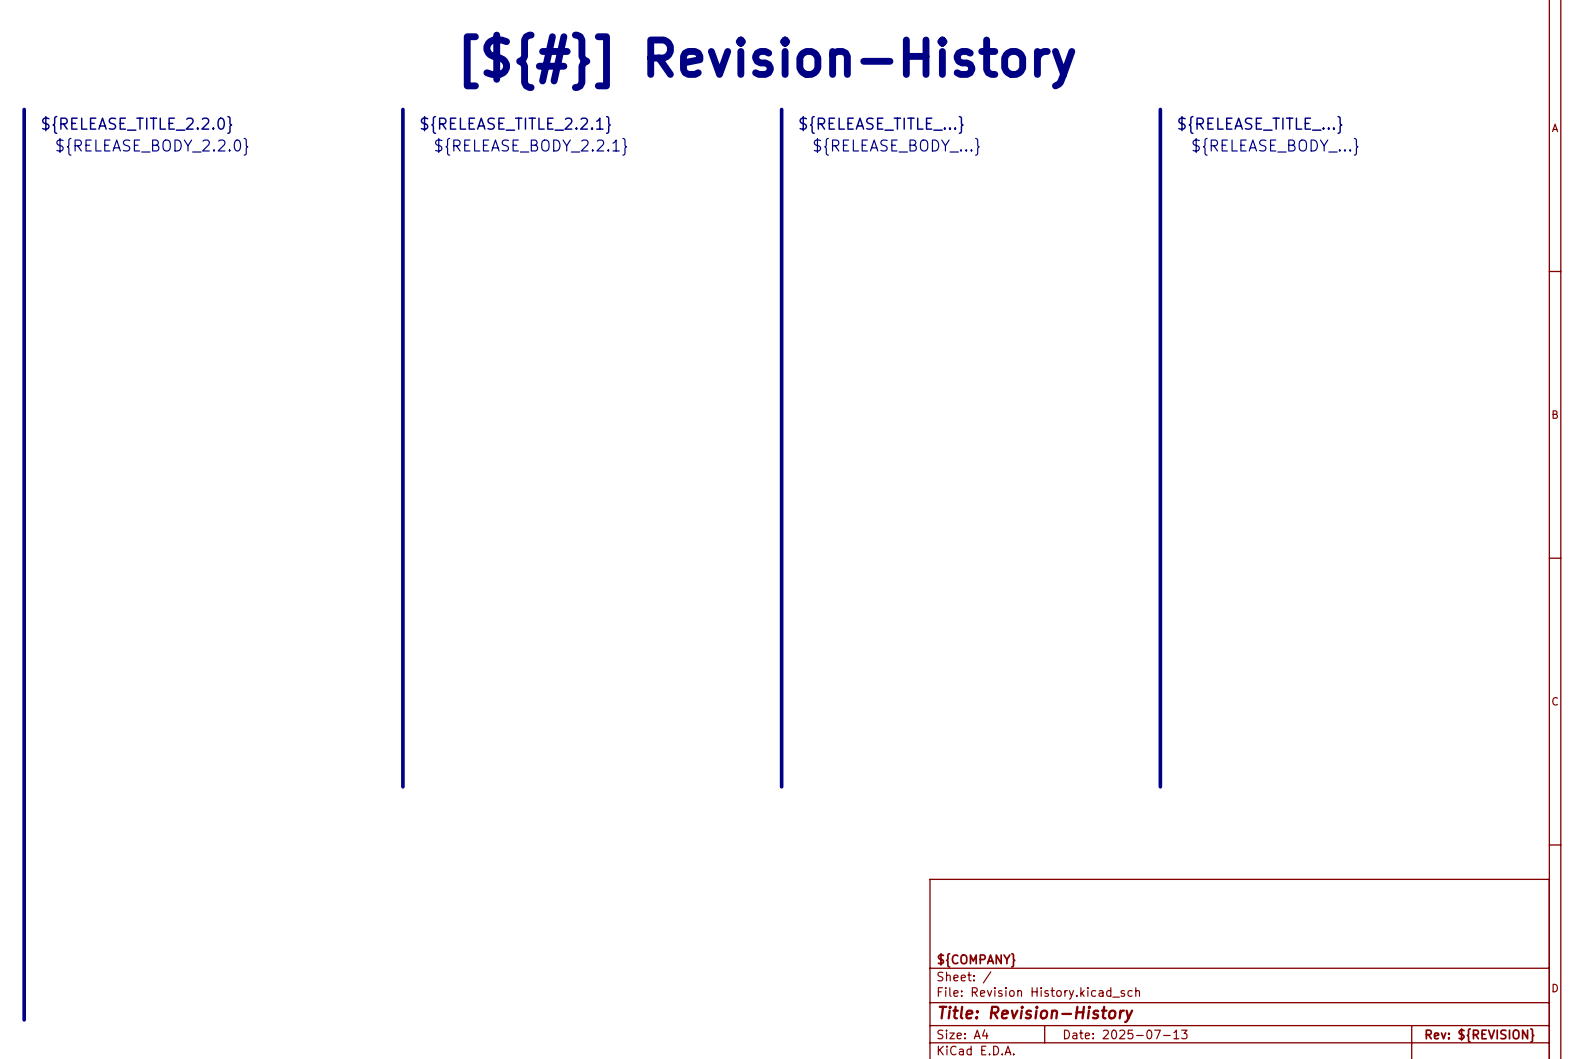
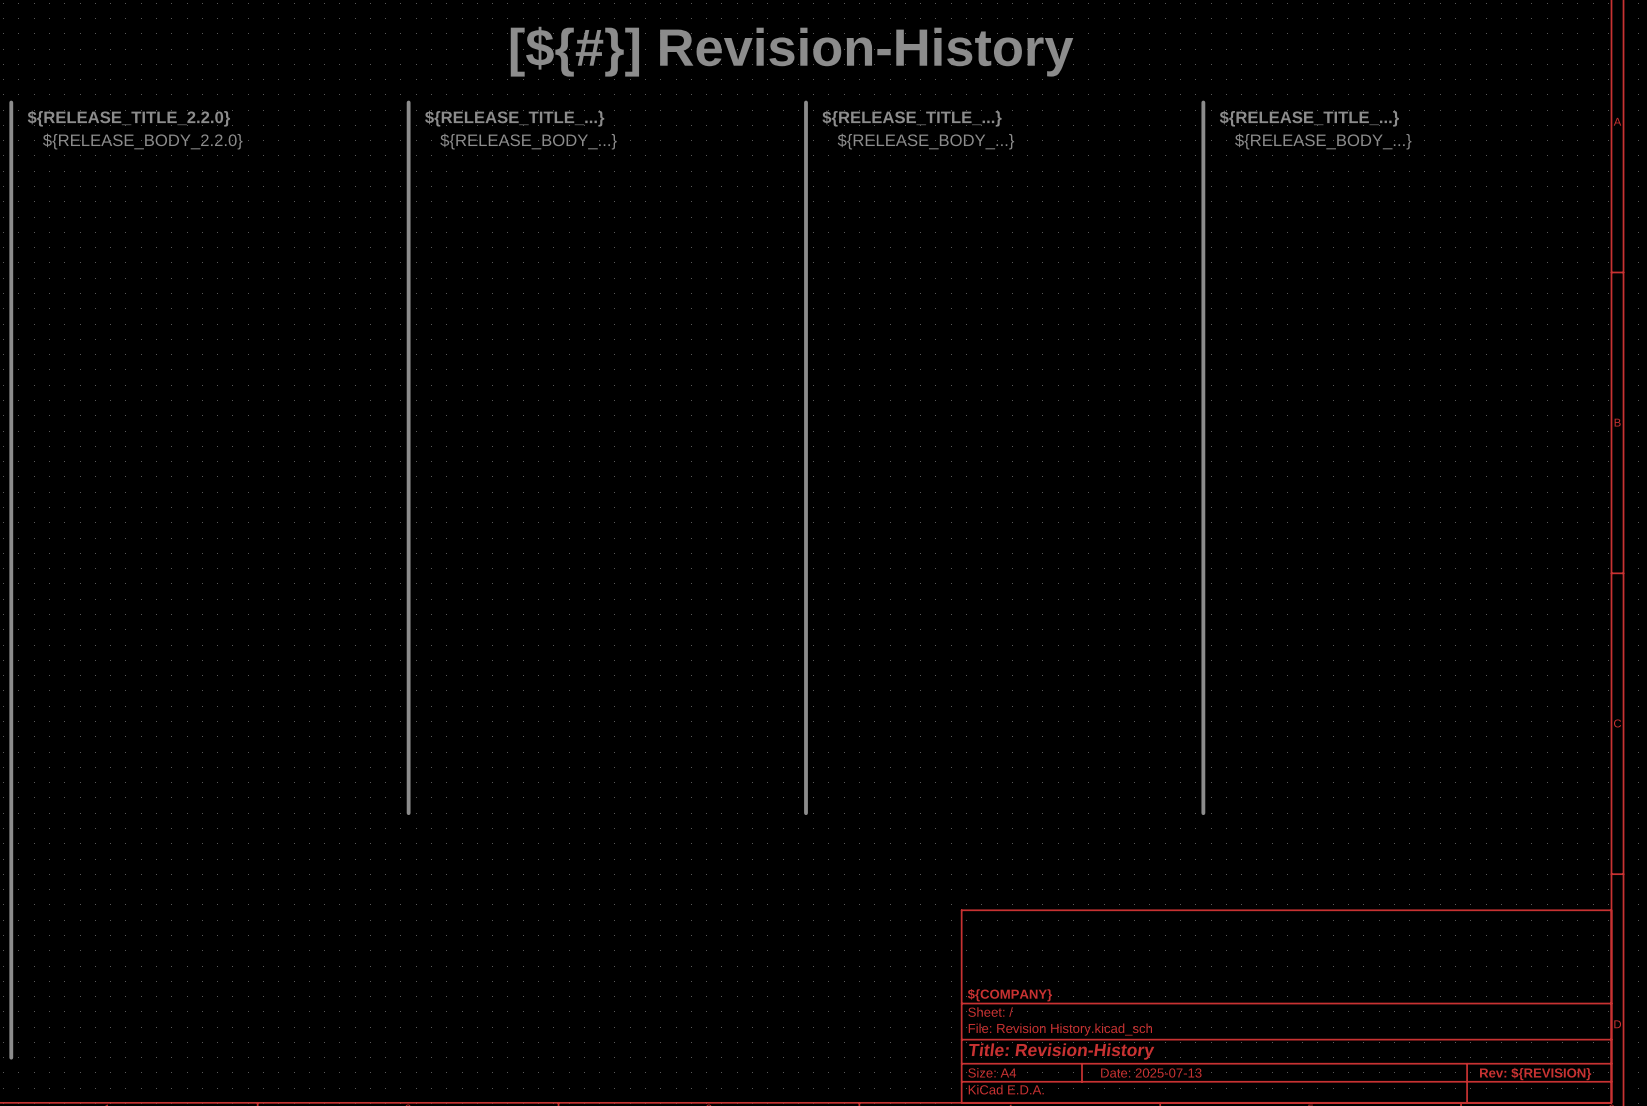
text: ${RELEASE_TITLE_2.2.1} (515, 124) -> ${RELEASE_TITLE_...} (514, 118)
text: ${RELEASE_BODY_2.2.1} (531, 146) -> ${RELEASE_BODY_...} (528, 141)

